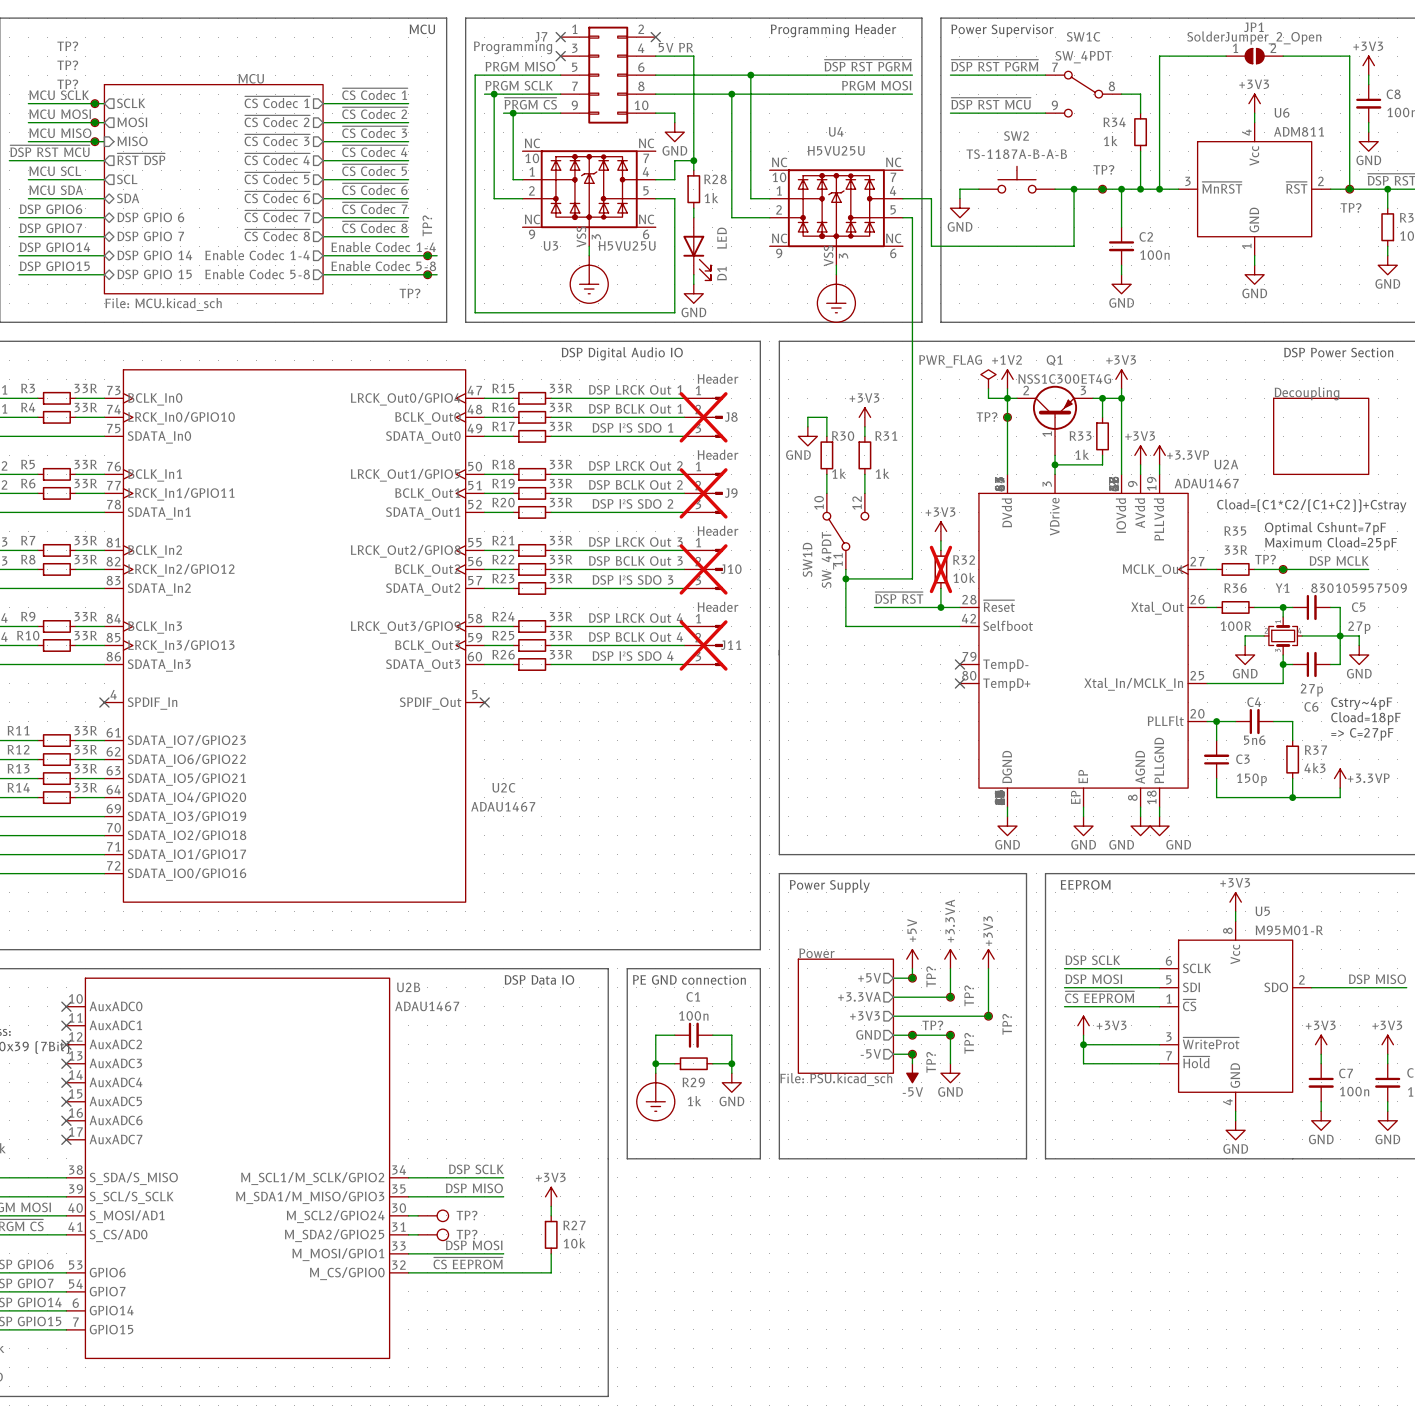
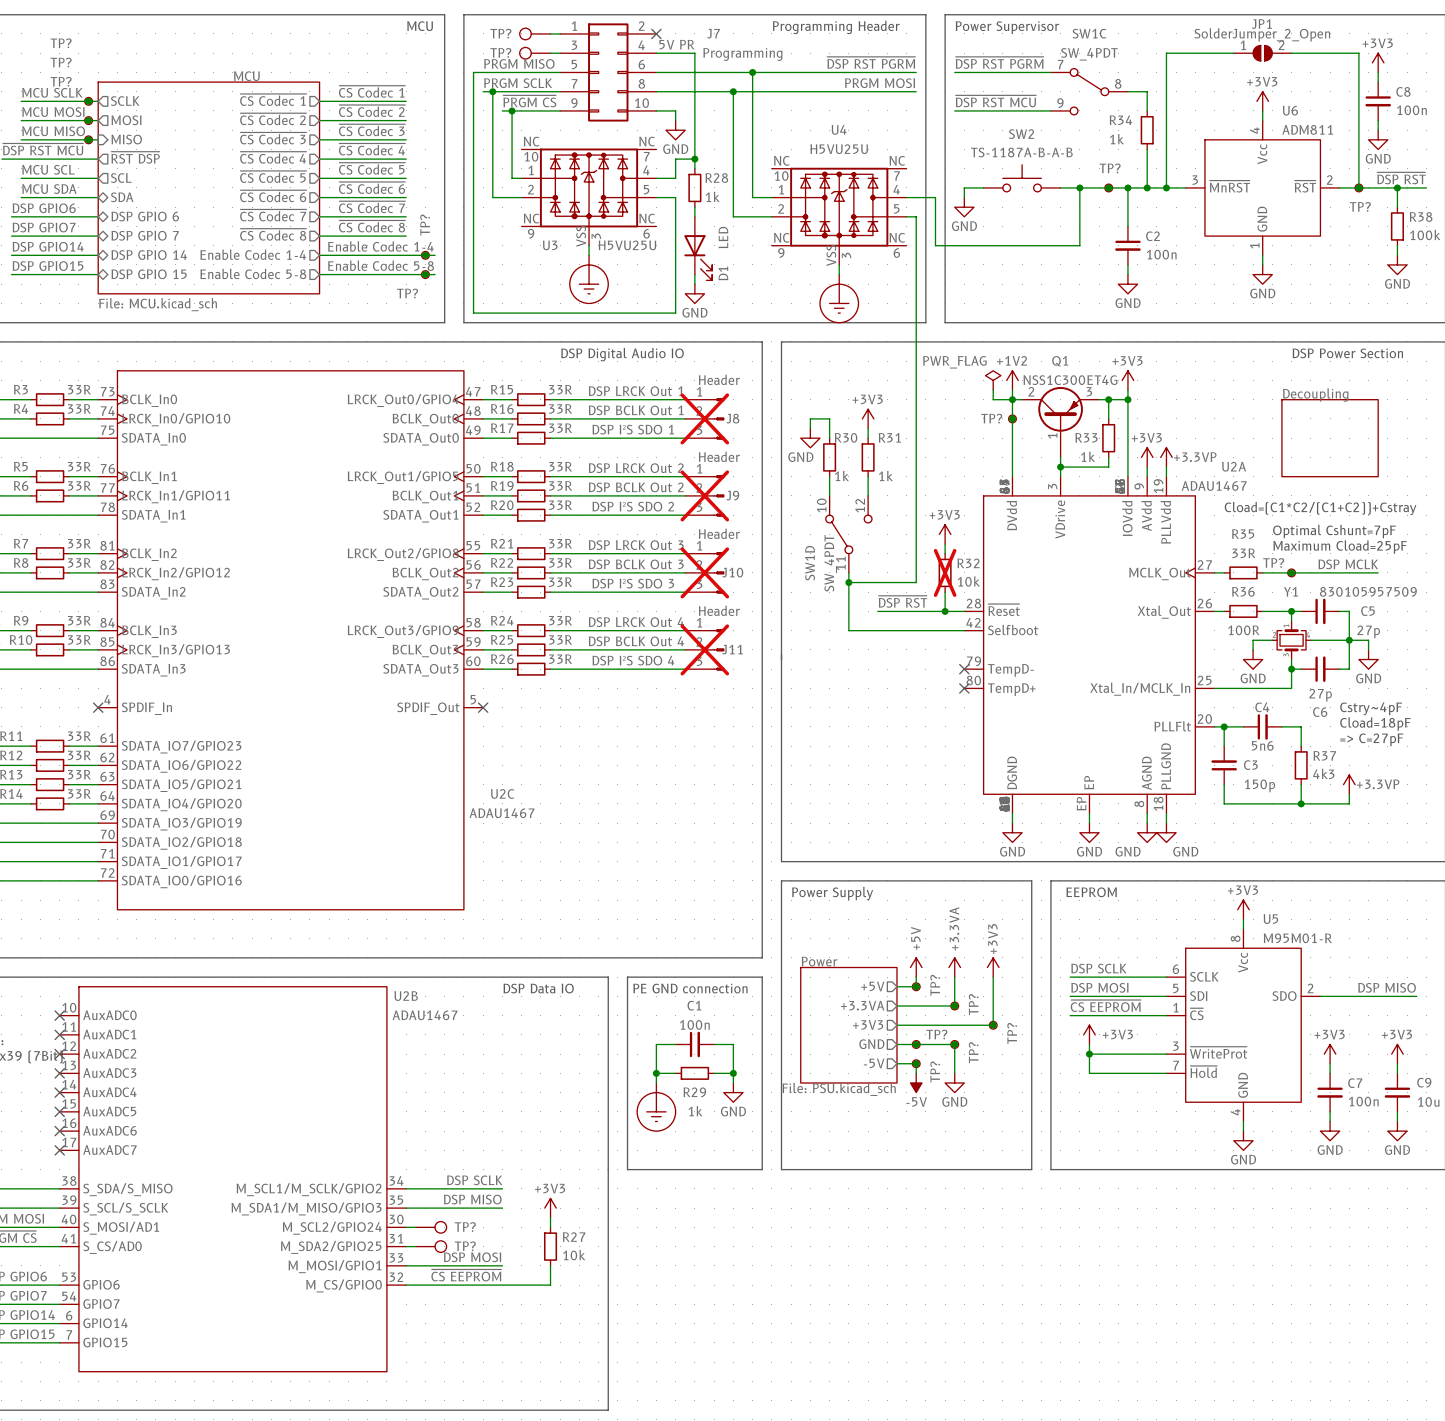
J7 name position: J7 (541, 36) -> J7 (713, 33)
TP?: none -> (535, 33)
wire: none -> (550, 33) (560, 33)
no-connect mark: (560, 37) -> none
J7 value position: Programming (513, 47) -> Programming (742, 54)
TP?: none -> (535, 53)
wire: none -> (550, 53) (560, 53)
no-connect mark: (560, 56) -> none

